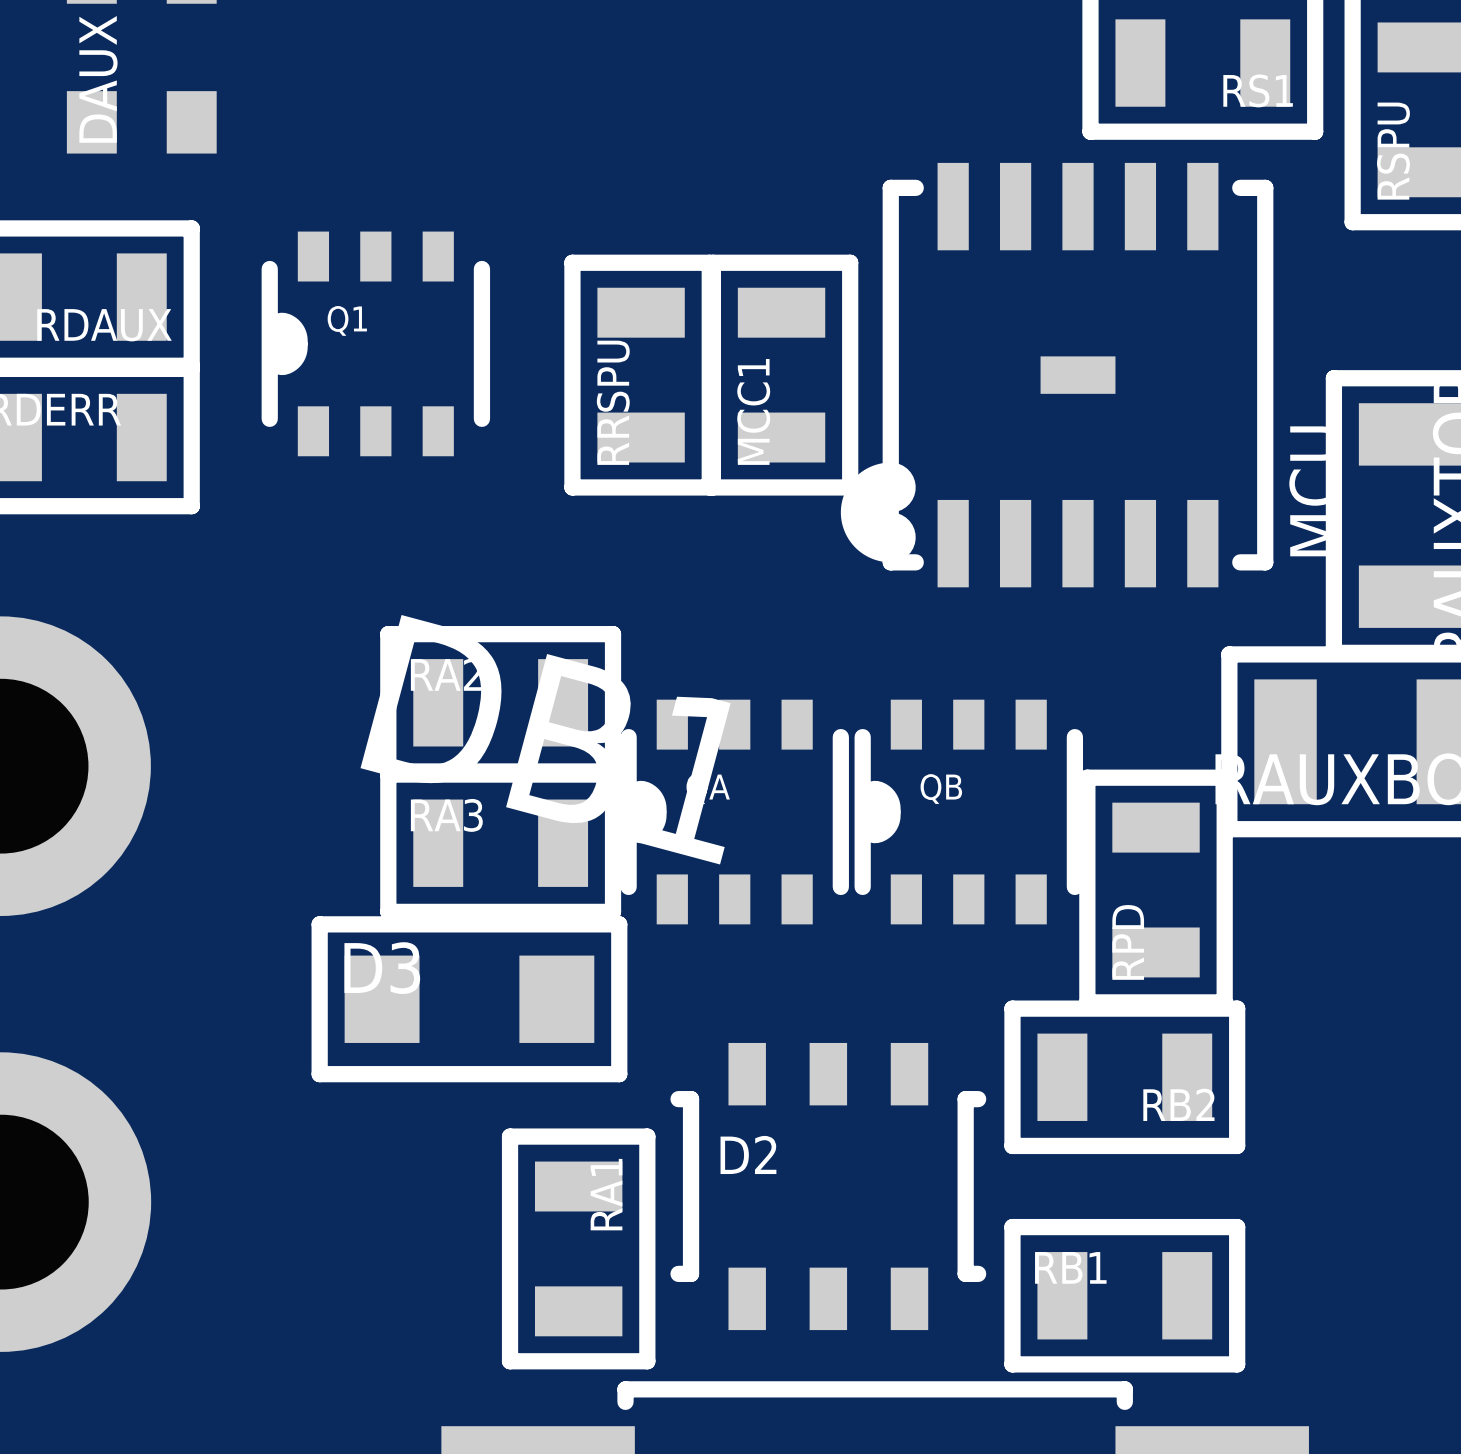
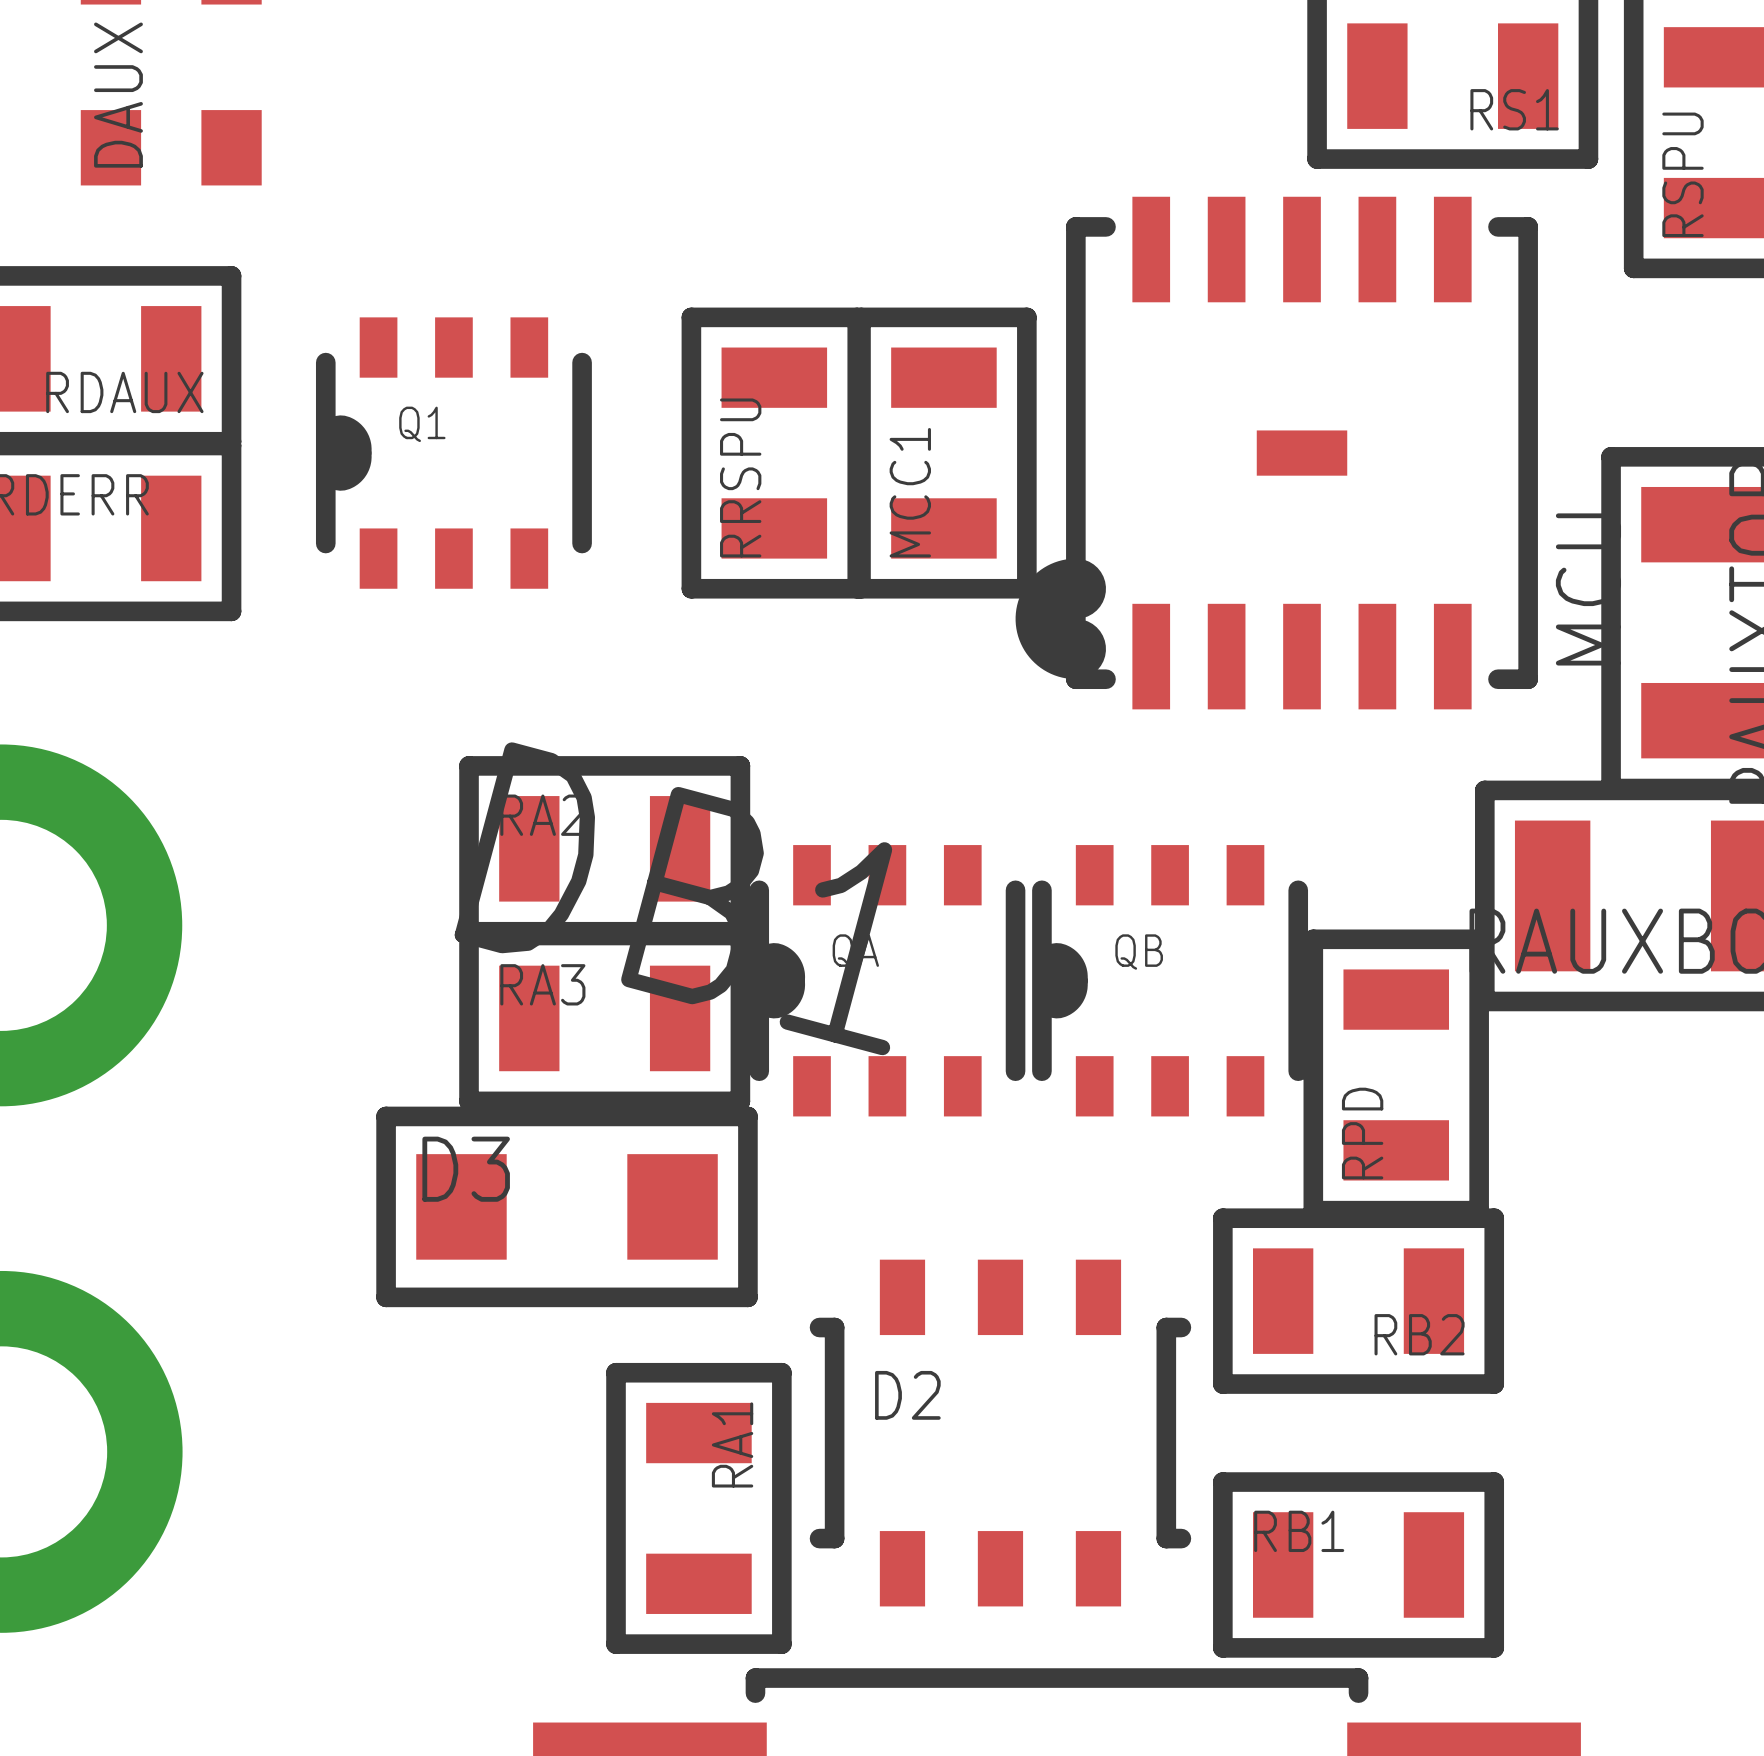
Q1 position: (375, 343) -> (453, 453)

